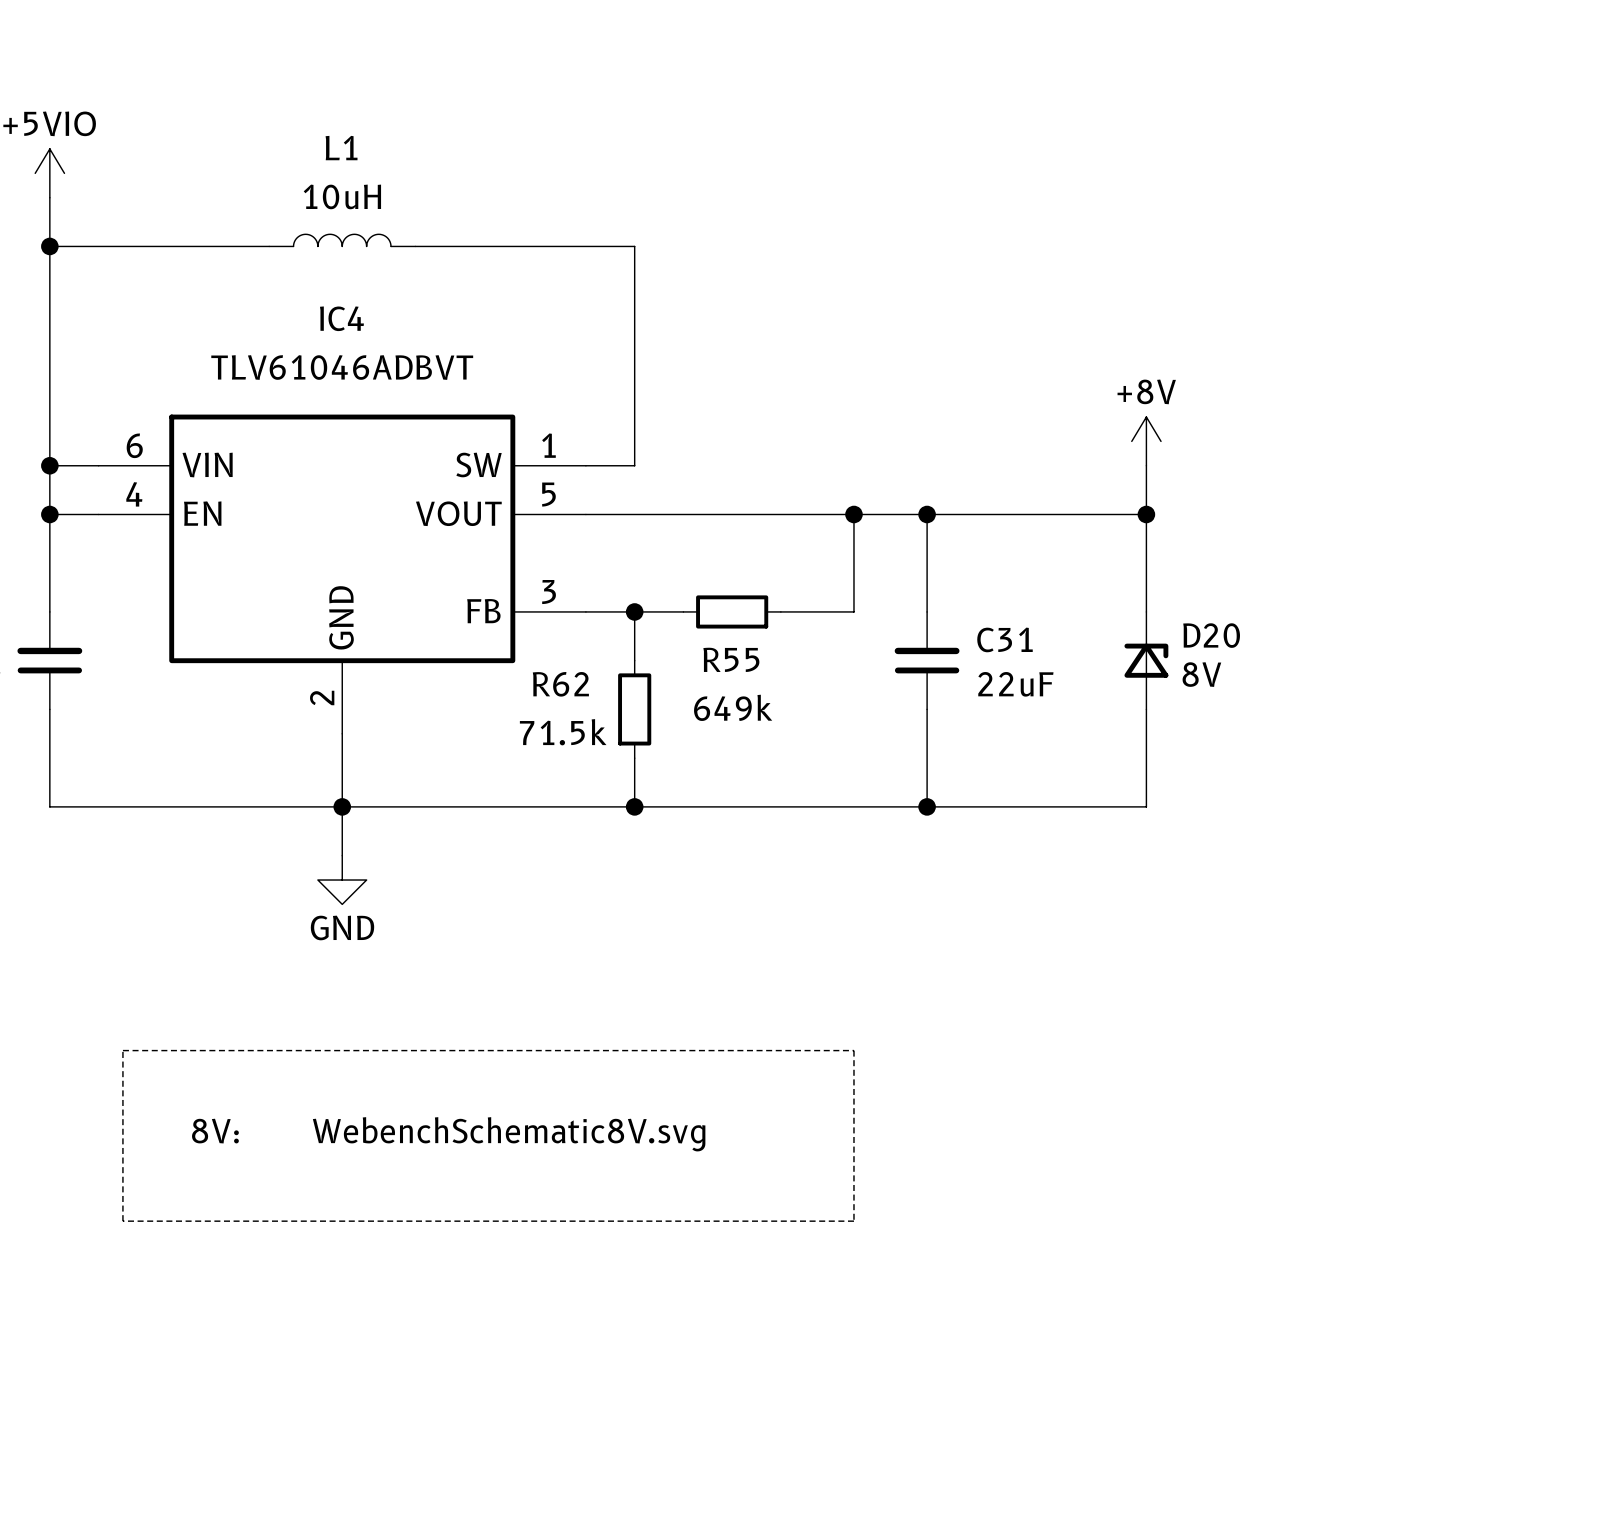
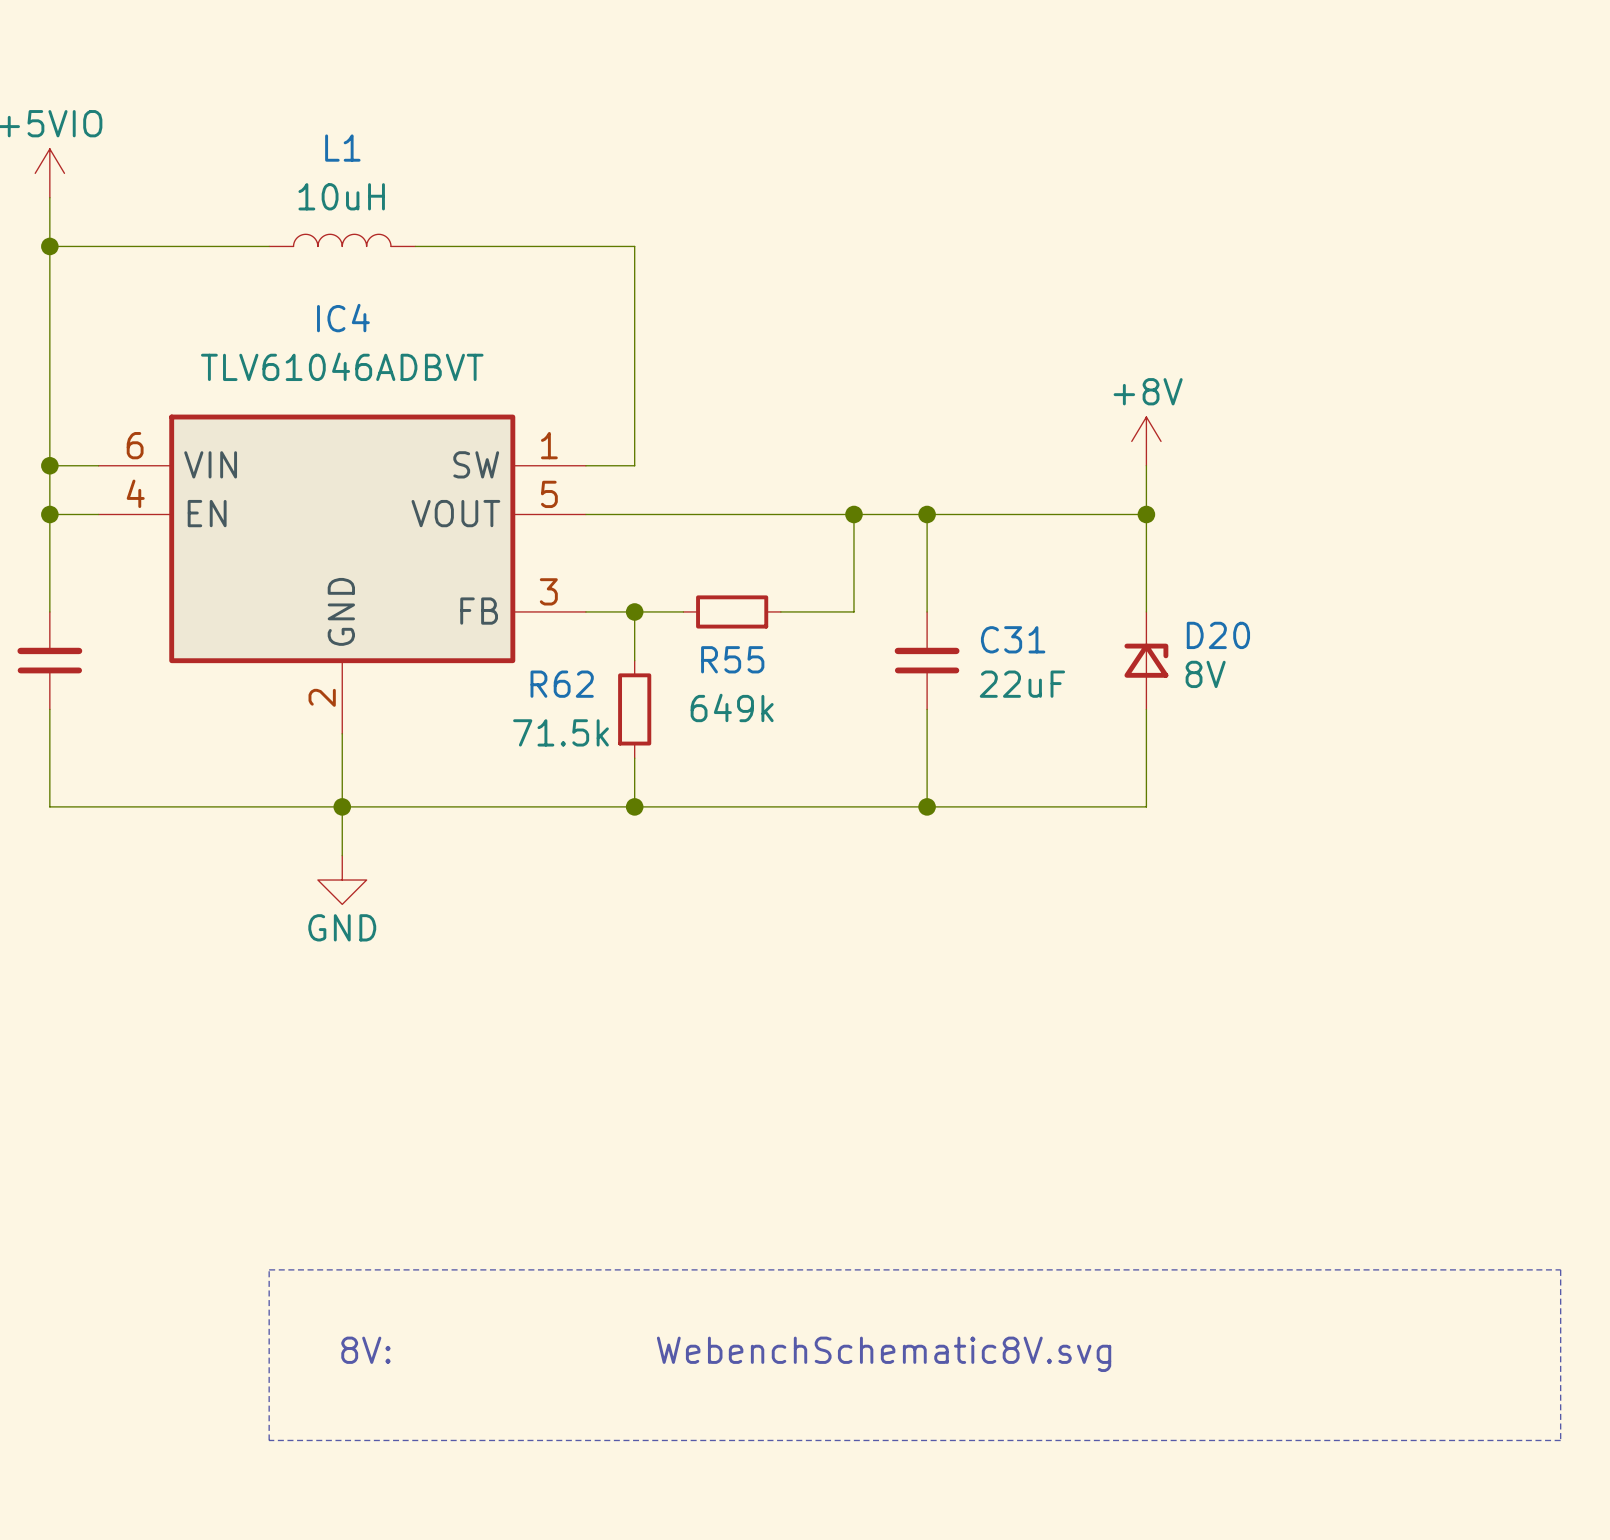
line: (122, 1050) (853, 1050) (853, 1221) (122, 1221) (122, 1050) -> none
text position: 8V: (215, 1131) -> 8V: (365, 1350)
text position: WebenchSchematic8V.svg (509, 1134) -> WebenchSchematic8V.svg (884, 1354)
line: none -> (269, 1269) (1560, 1269) (1560, 1440) (269, 1440) (269, 1269)

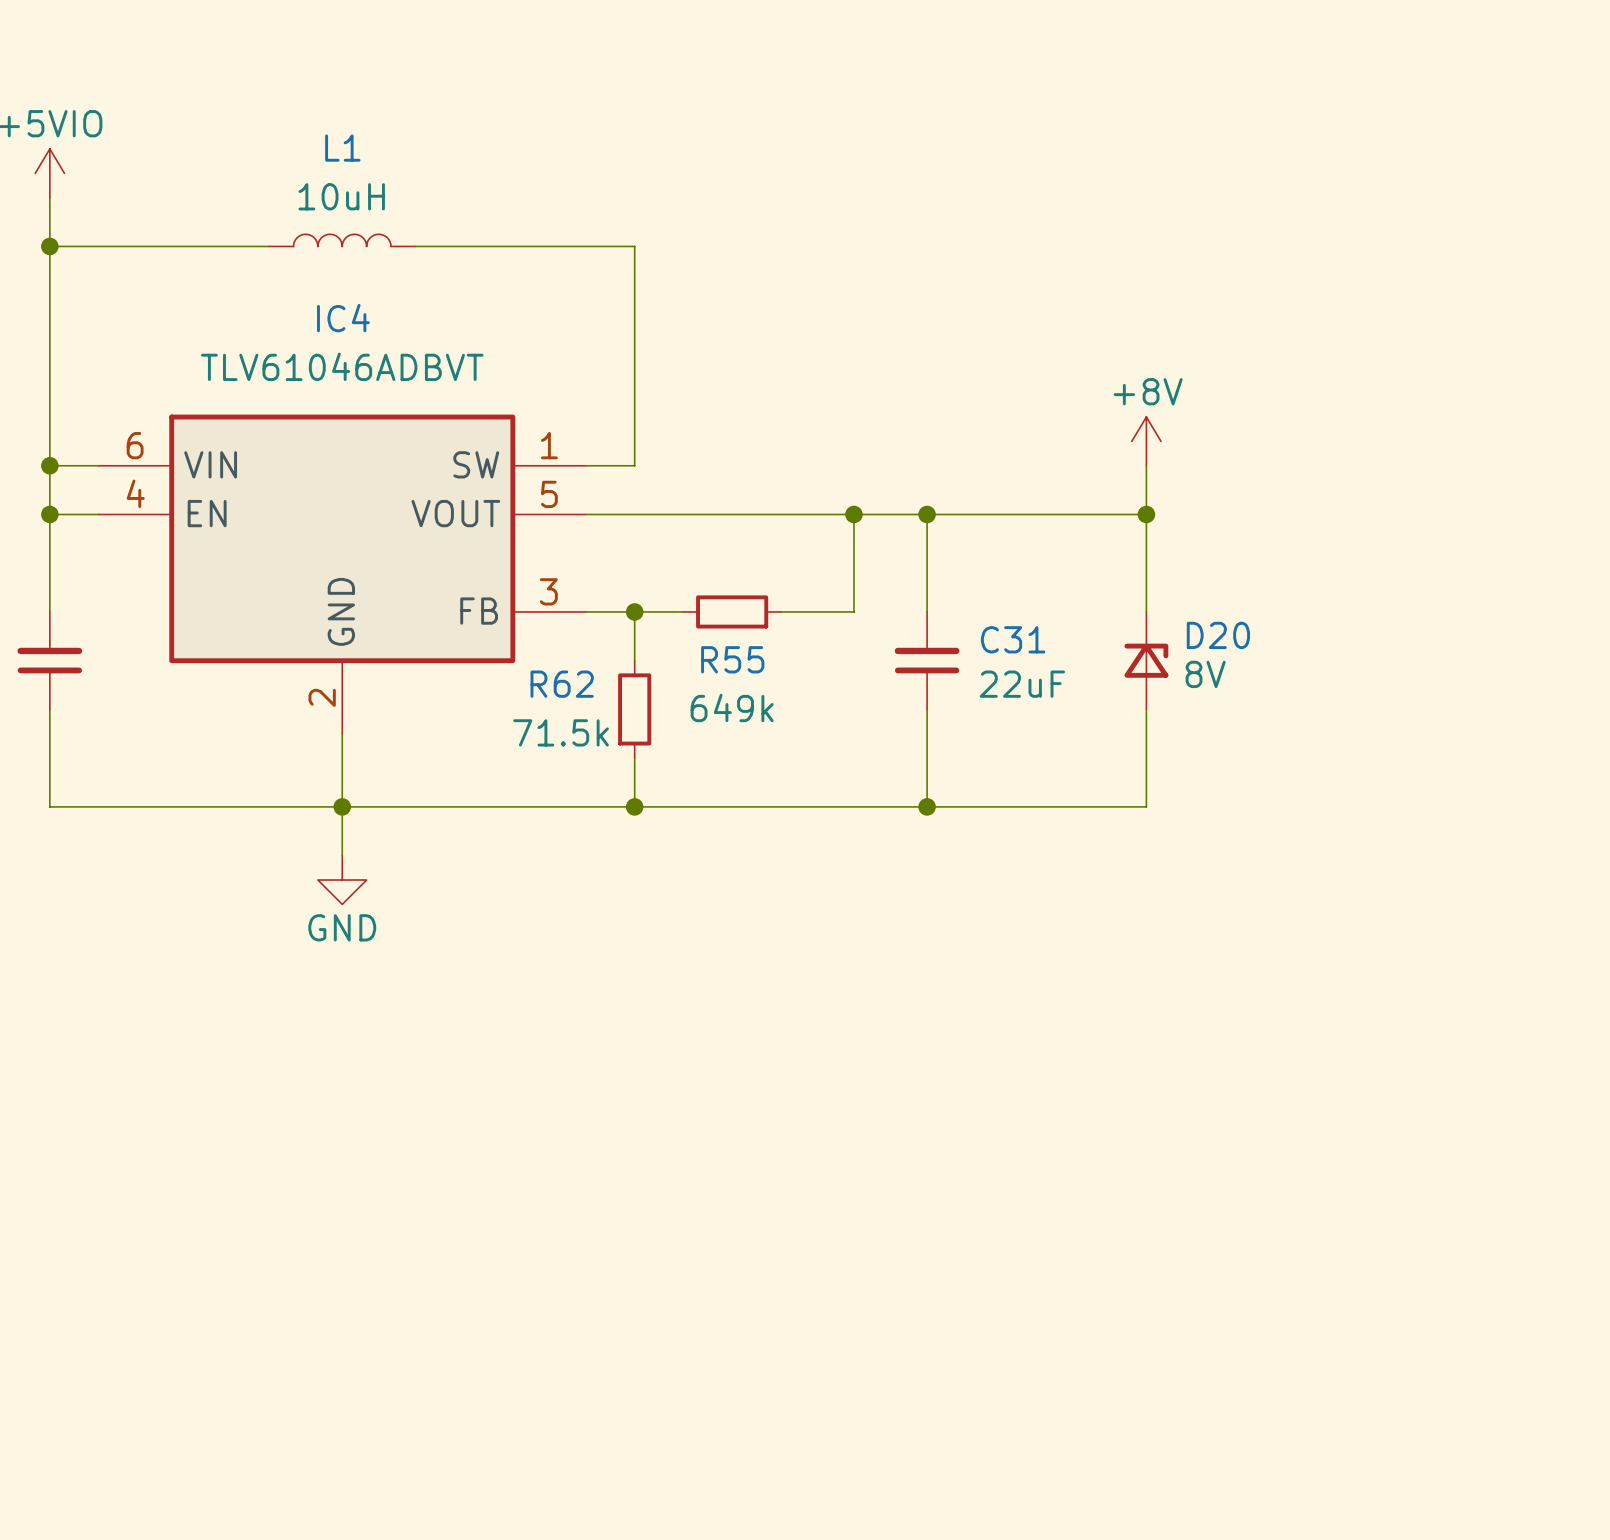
line: (269, 1269) (1560, 1269) (1560, 1440) (269, 1440) (269, 1269) -> none
text: 8V: (365, 1350) -> none
text: WebenchSchematic8V.svg (884, 1354) -> none

